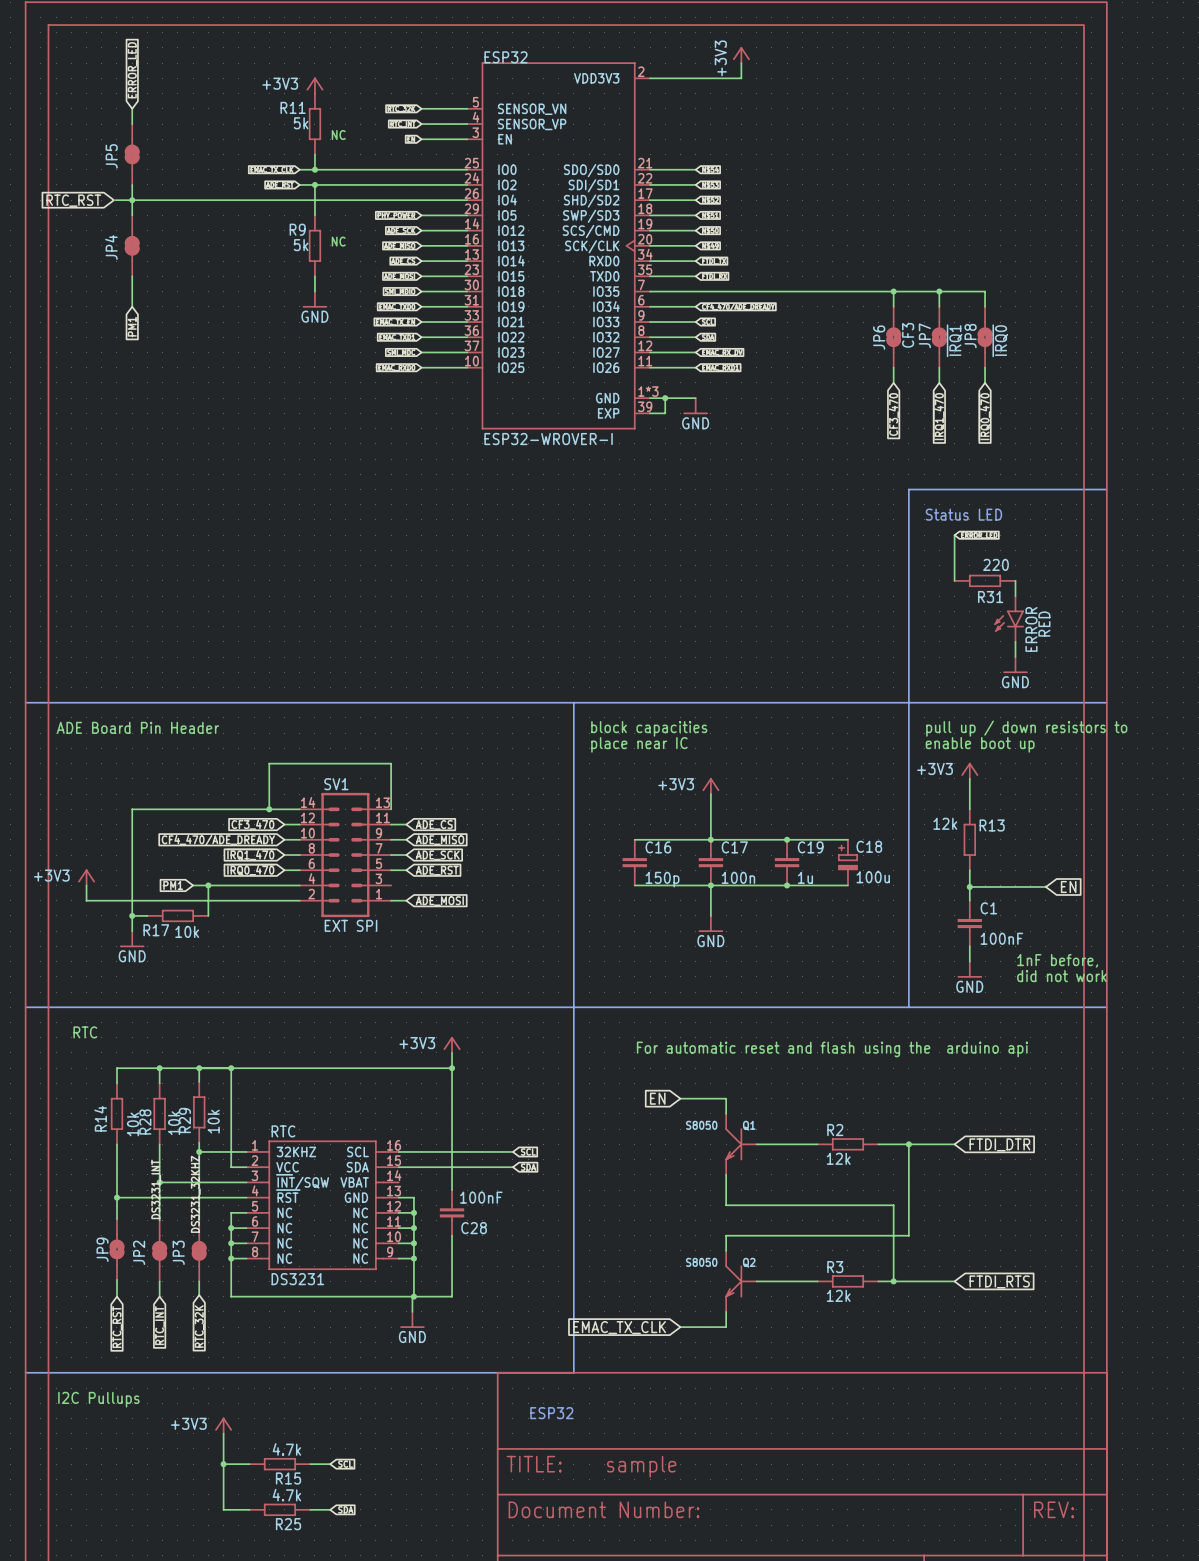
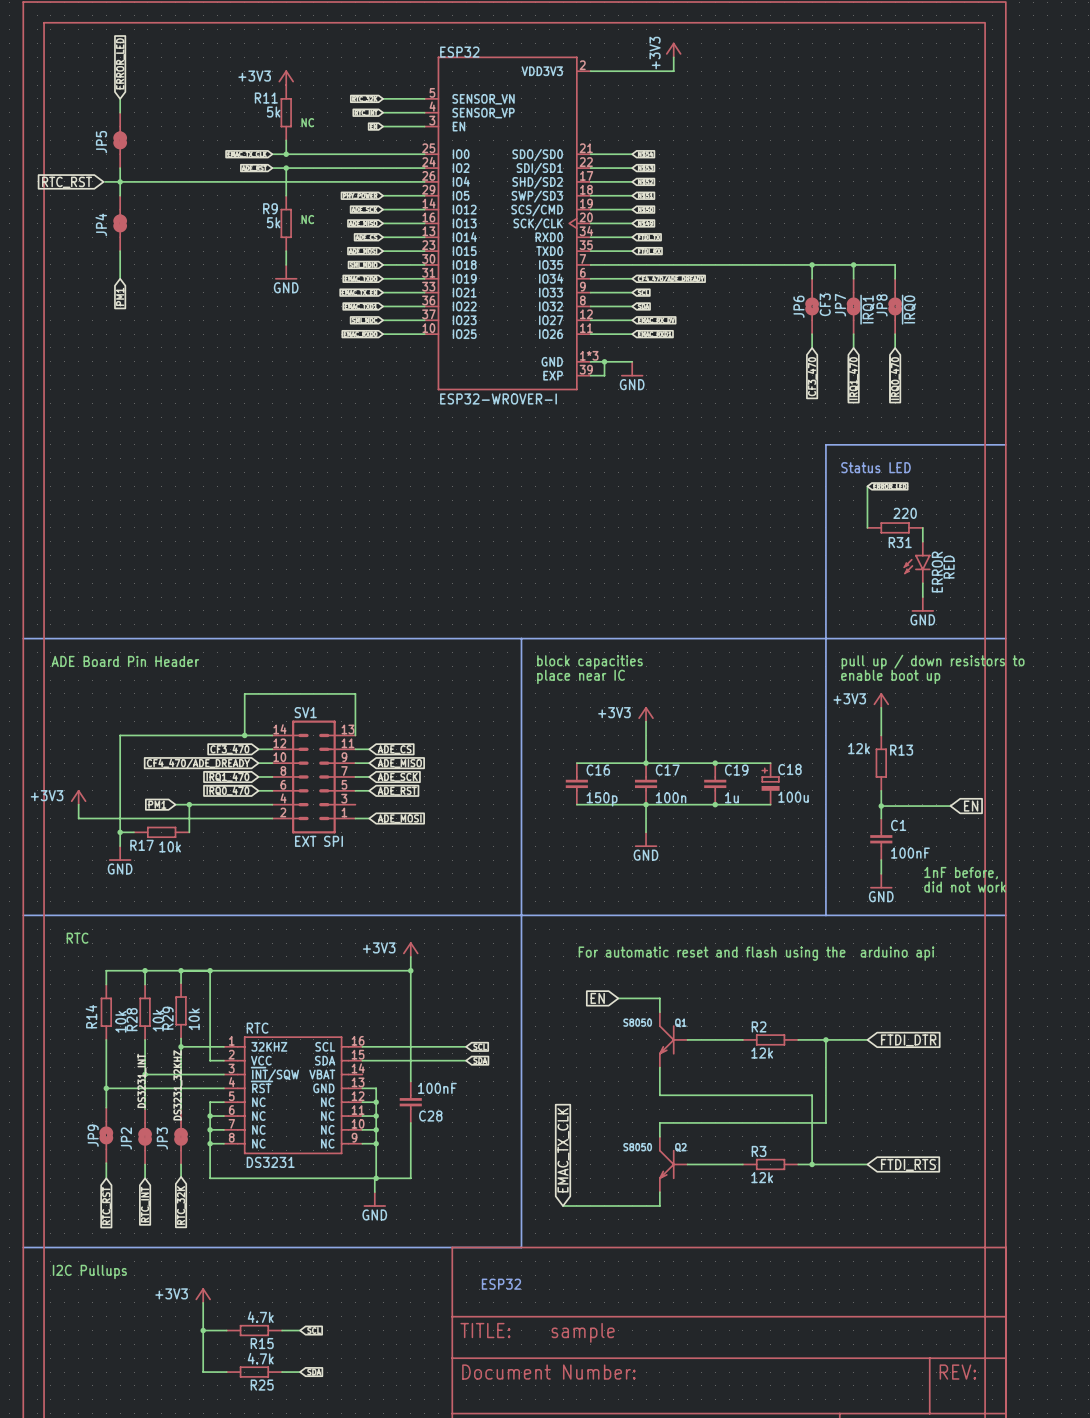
wire: none -> (563, 1205) (618, 1205)
global label rotation: 0° (619, 1327) -> 90° clockwise (563, 1150)

